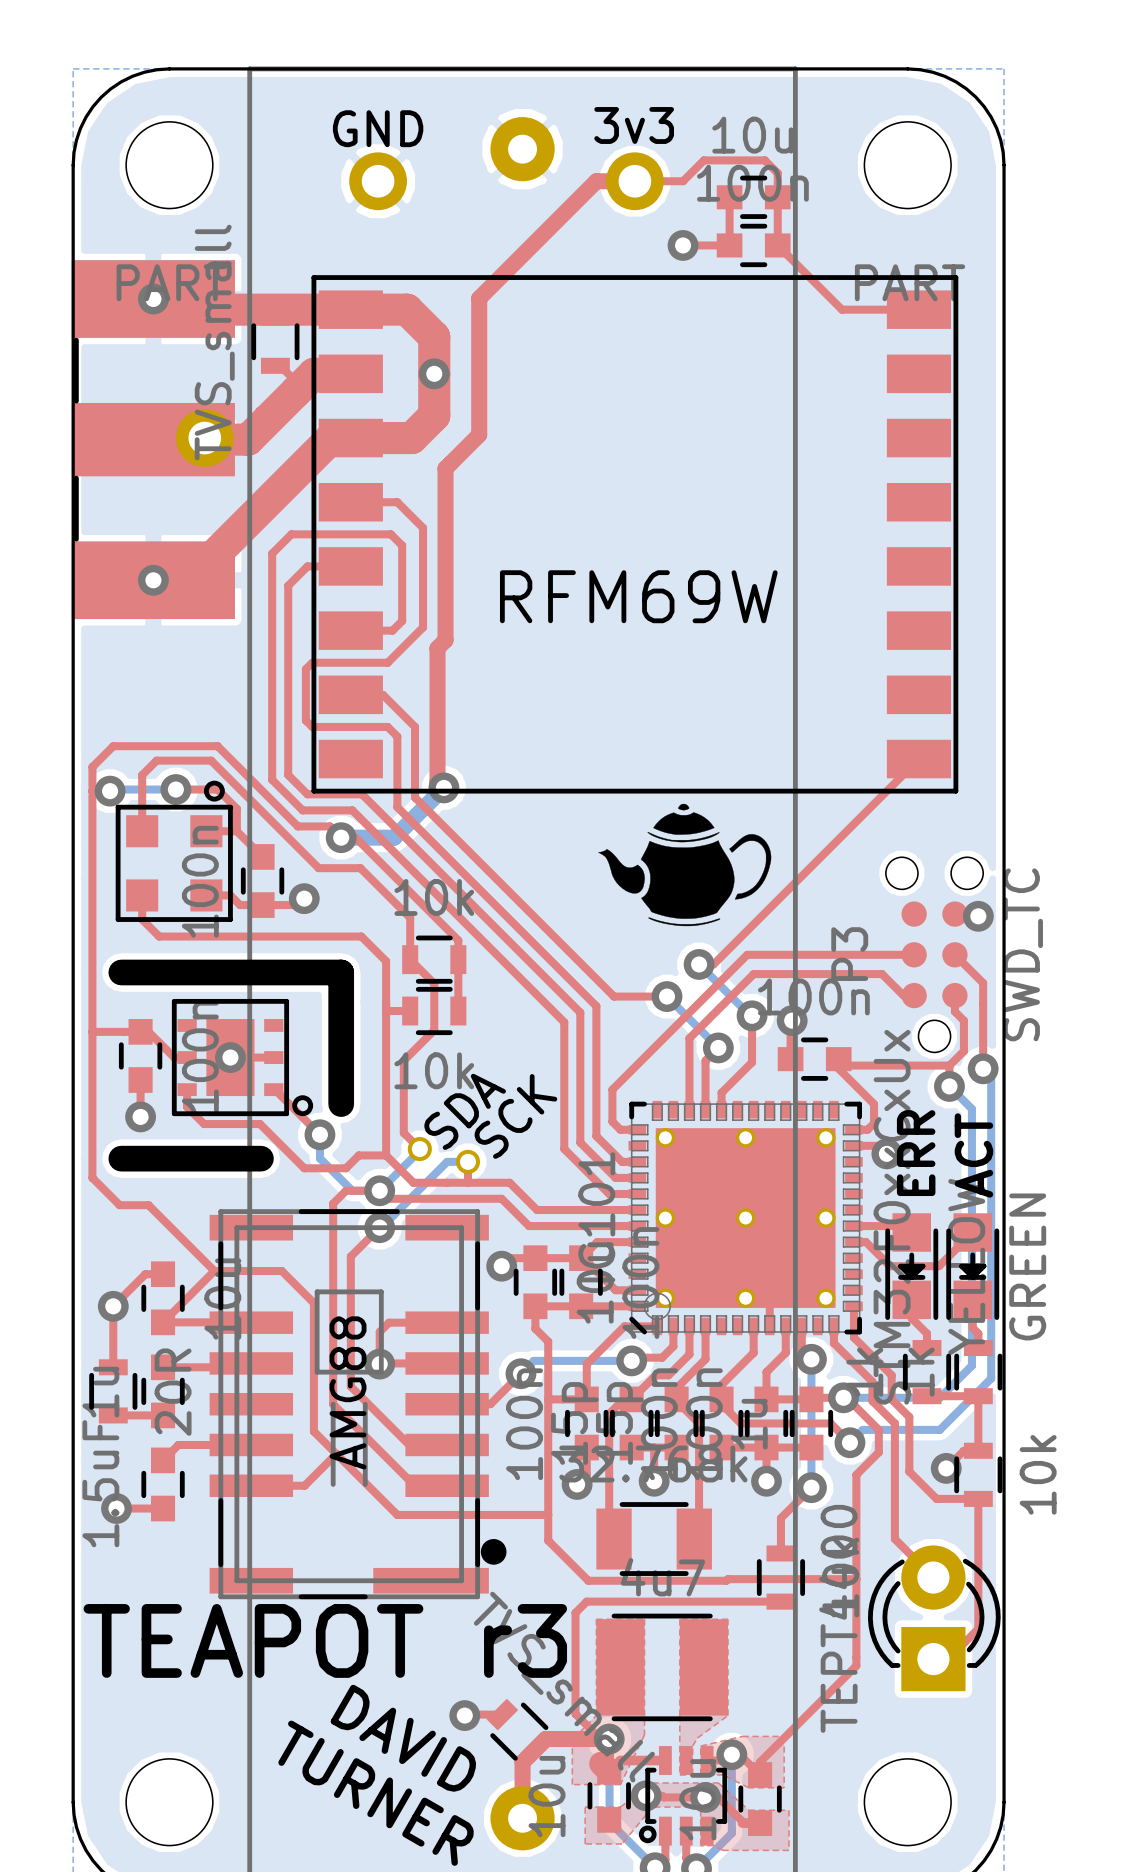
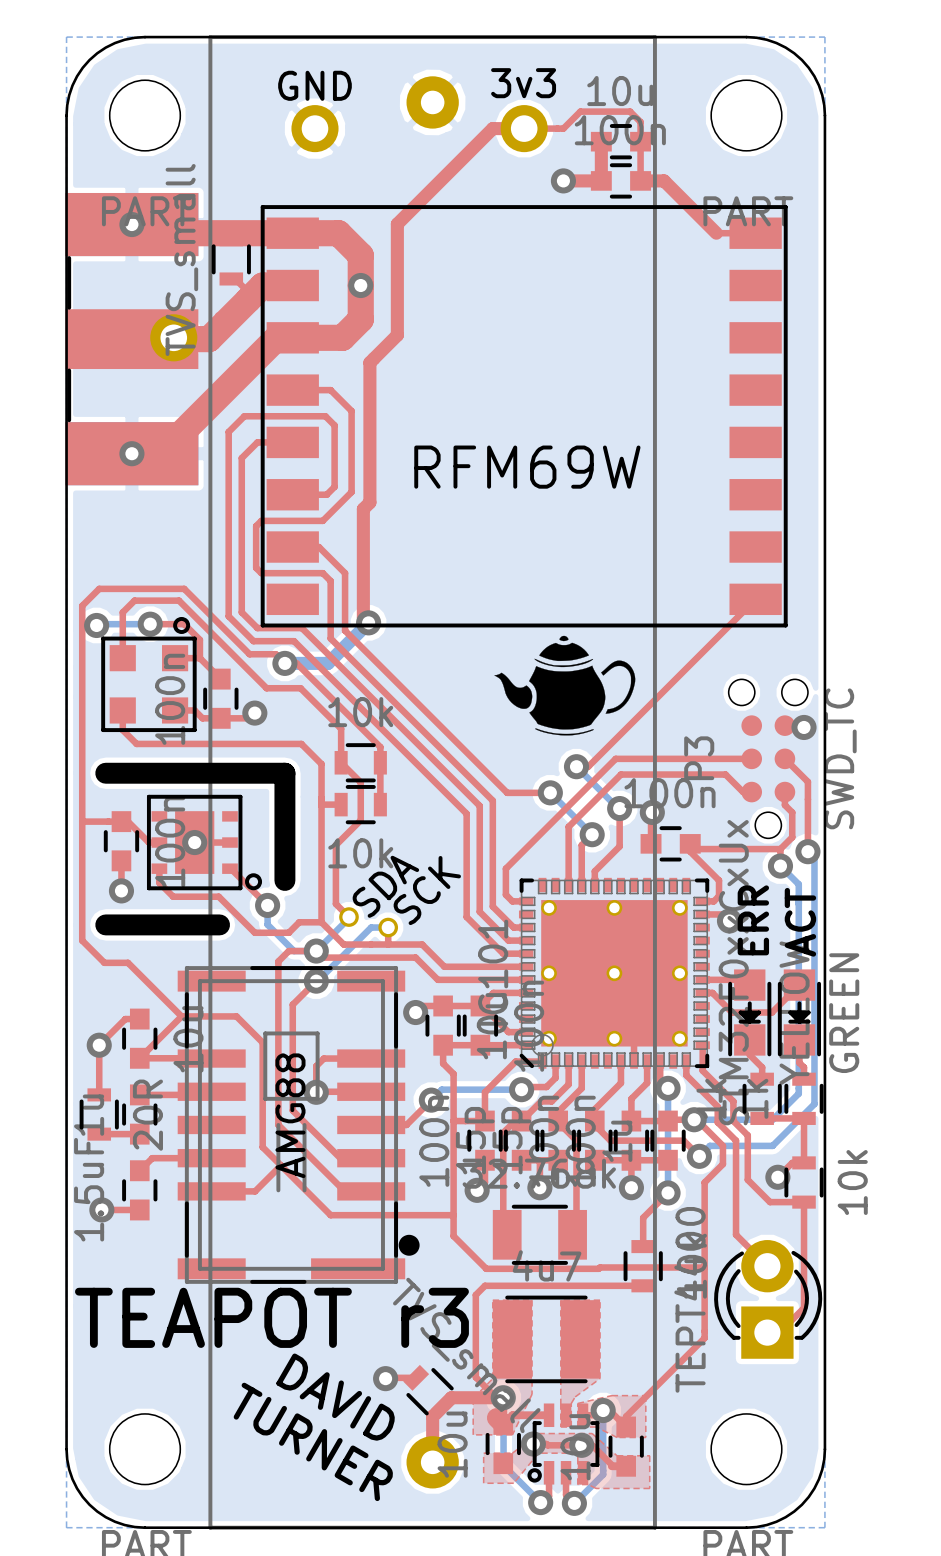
top track width: thin (729, 197) (729, 245) (683, 245) -> thick (601, 141) (601, 180) (563, 180)
top track: (777, 245) (841, 309) (870, 309) -> (640, 180) (664, 180) (716, 233)

